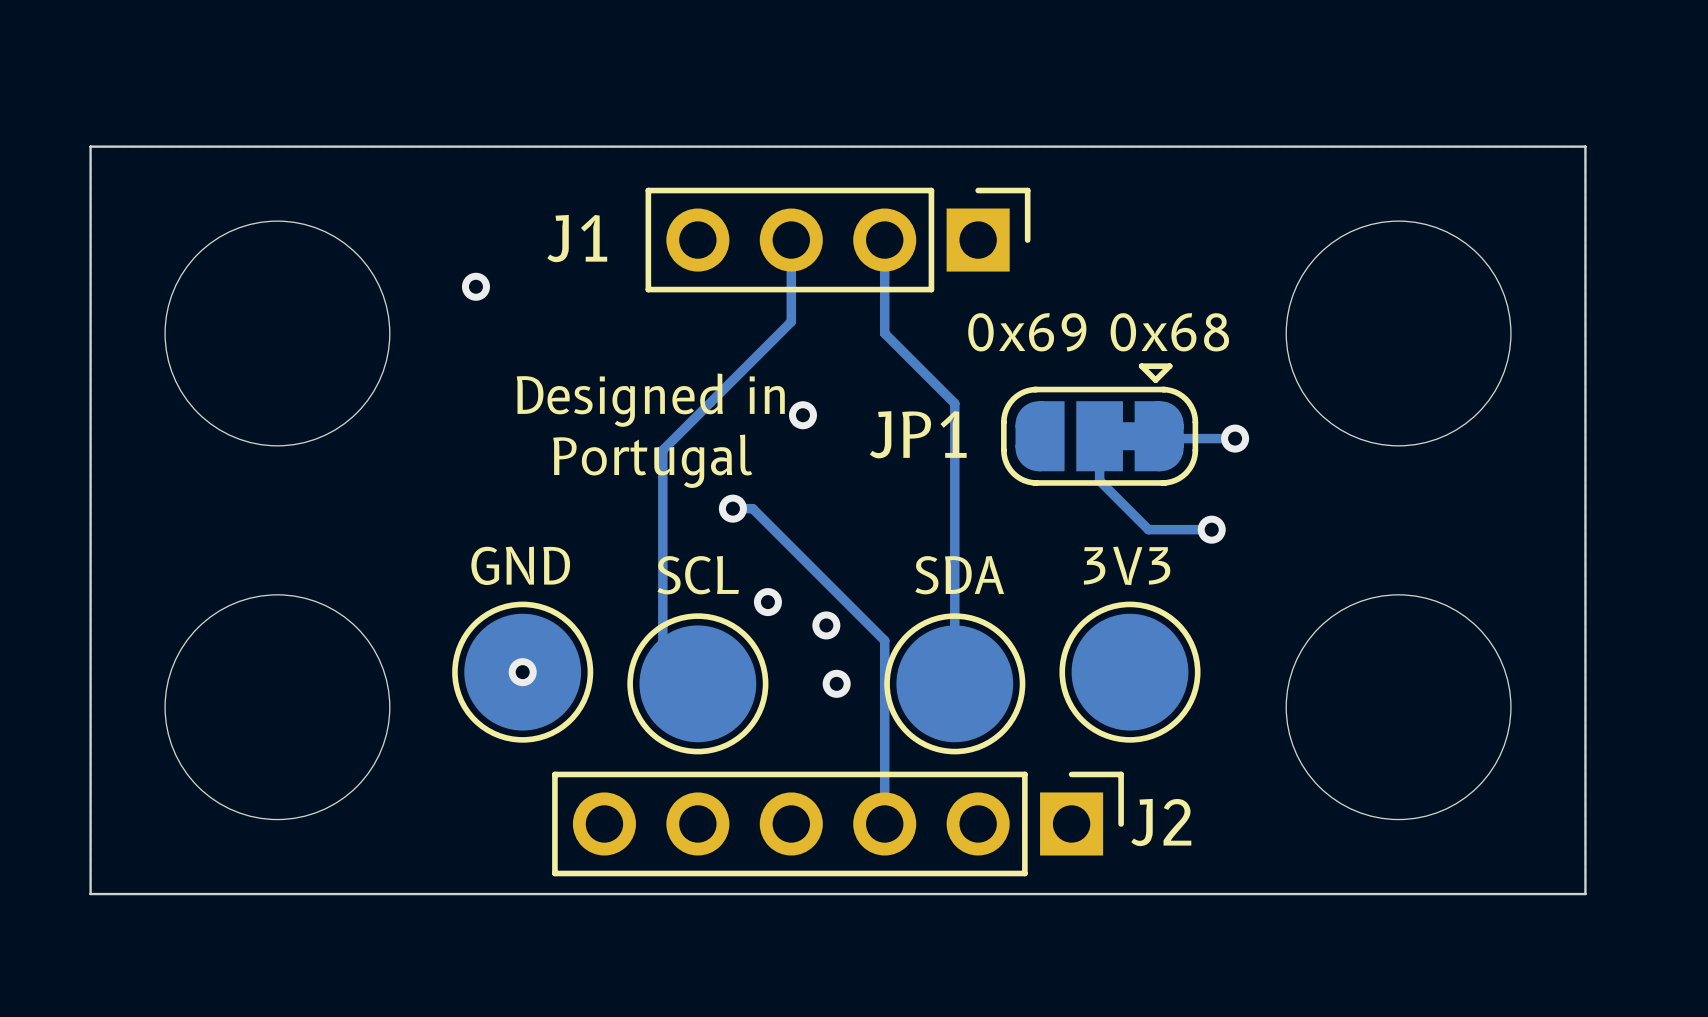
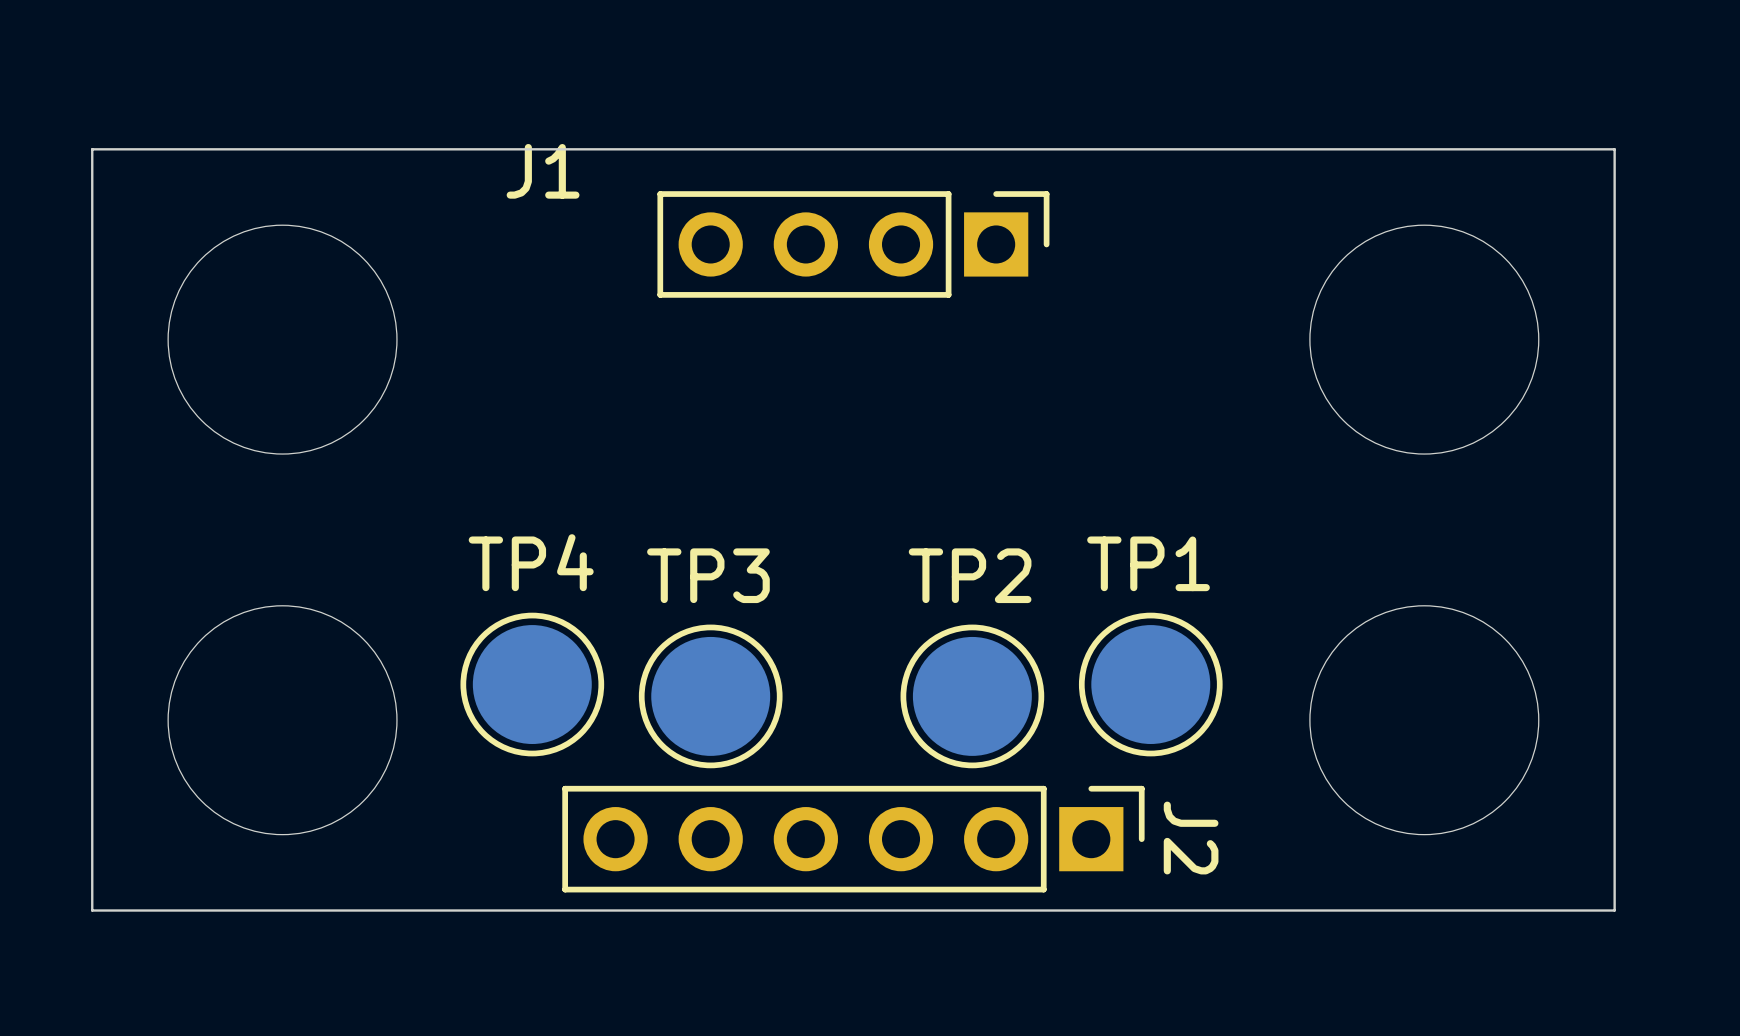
J1 name position: J1 (577, 238) -> J1 (543, 171)
track: (791, 240) (791, 321) (662, 450) (662, 648) (697, 683) -> none
track: (884, 240) (884, 333) (954, 403) (954, 683) -> none
via: (475, 286) -> none
text: 0x69 0x68 (1098, 332) -> none
text: Designed in (650, 400) -> none
via: (802, 415) -> none
JP1: (1099, 424) -> none
track: (1099, 436) (1099, 480) (1148, 529) (1211, 529) -> none
track: (1235, 438) (1179, 438) -> none
via: (1235, 438) -> none
text: Portugal (652, 461) -> none
track: (732, 508) (752, 508) (884, 640) (884, 823) -> none
via: (732, 508) -> none
via: (1211, 529) -> none
TP4 name: none -> TP4 (531, 562)
TP1 name: none -> TP1 (1148, 563)
text: GND (520, 565) -> none
TP3 name: none -> TP3 (708, 575)
TP2 name: none -> TP2 (970, 575)
text: 3V3 (1127, 565) -> none
text: SCL (698, 575) -> none
text: SDA (959, 575) -> none
via: (767, 602) -> none
via: (826, 625) -> none
via: (522, 672) -> none
via: (836, 683) -> none
J2 name rotation: 0° (1161, 822) -> 90° clockwise (1191, 838)

